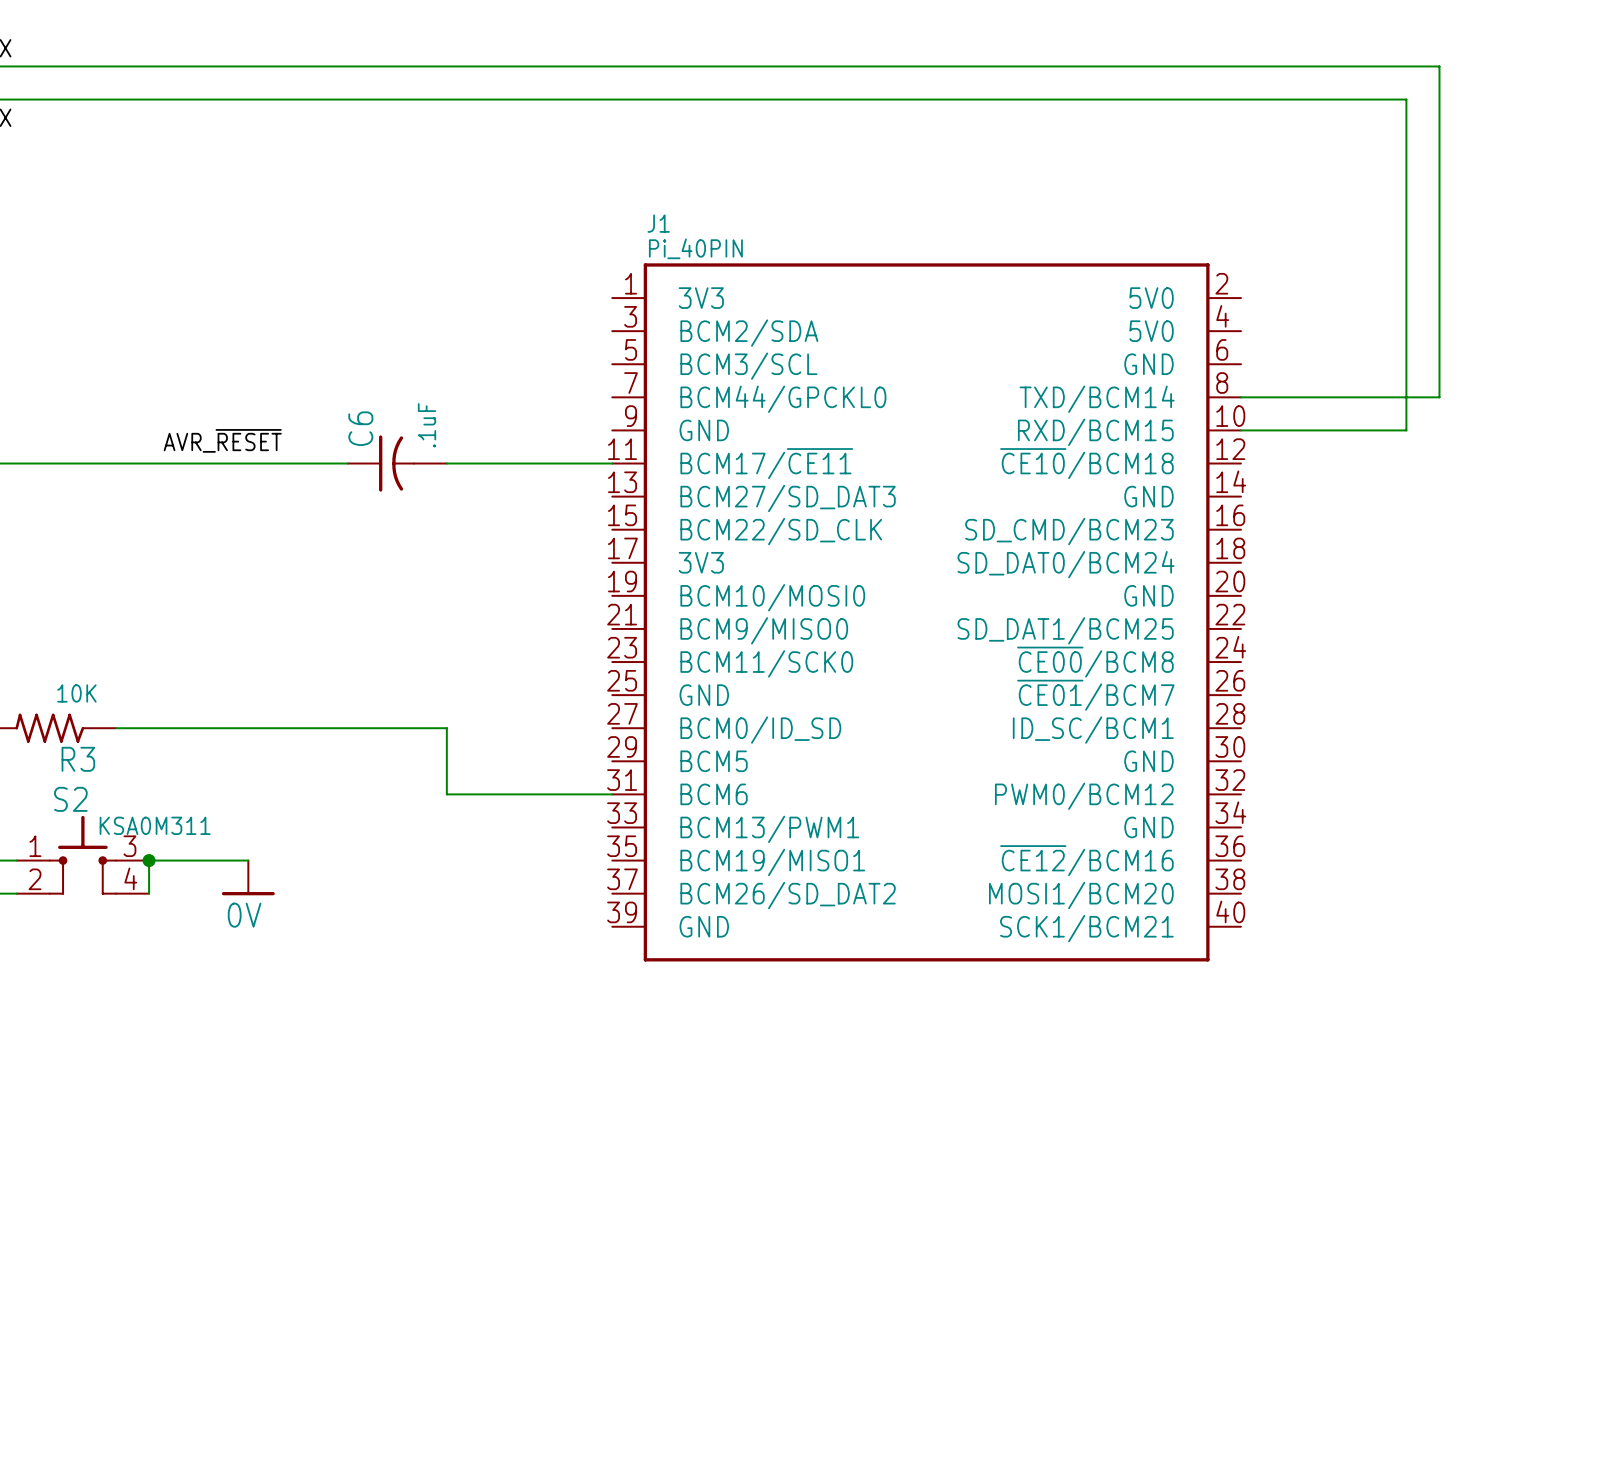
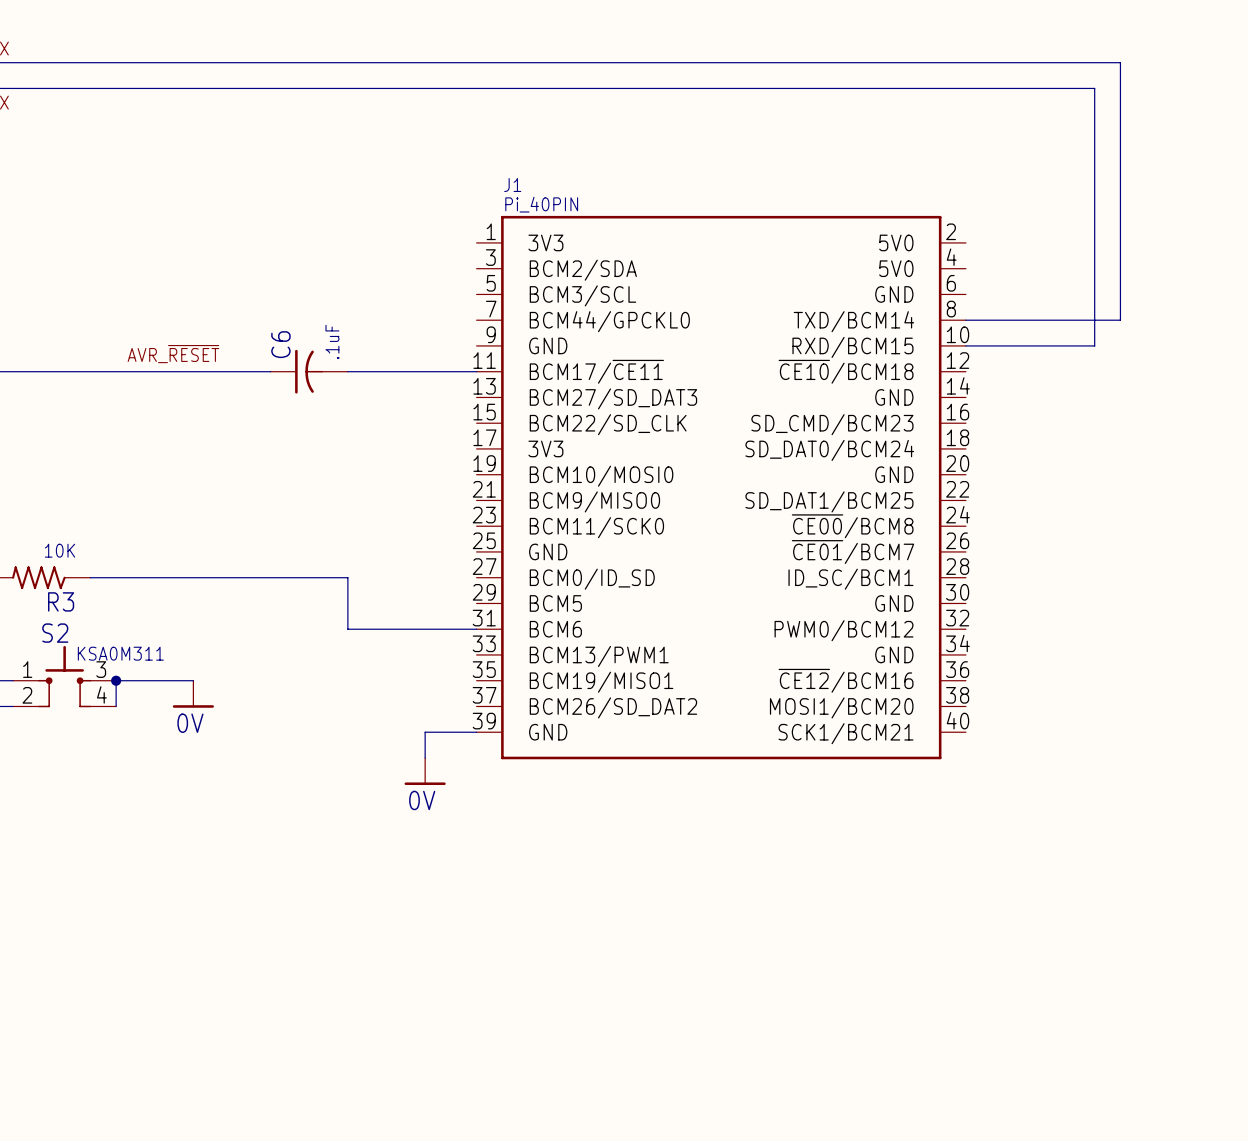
wire: none -> (476, 732) (425, 732) (425, 757)
power symbol: none -> 0V (425, 771)

